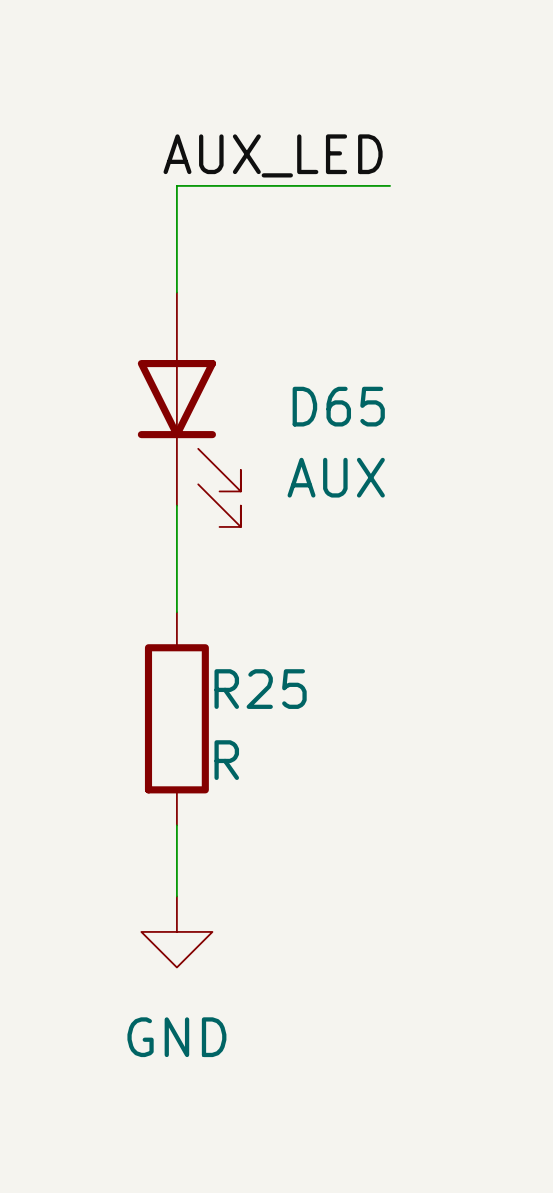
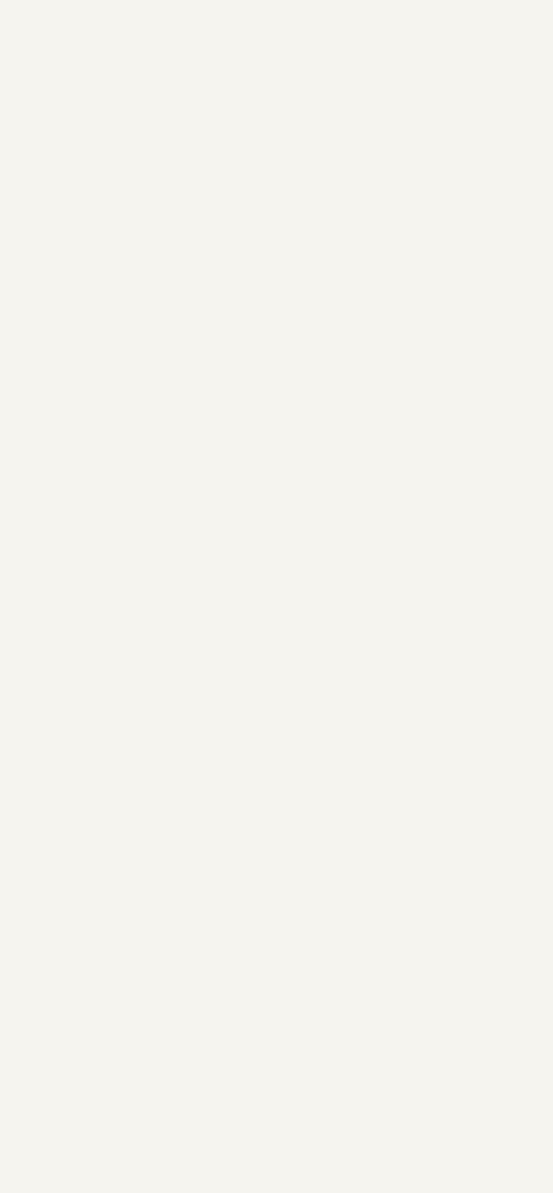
label: AUX_LED (273, 155) -> none
wire: (390, 185) (176, 185) (176, 292) -> none
D65: AUX (189, 409) -> none
wire: (176, 505) (176, 612) -> none
R25: R (176, 718) -> none
wire: (176, 825) (176, 896) -> none
power symbol: GND (176, 931) -> none

